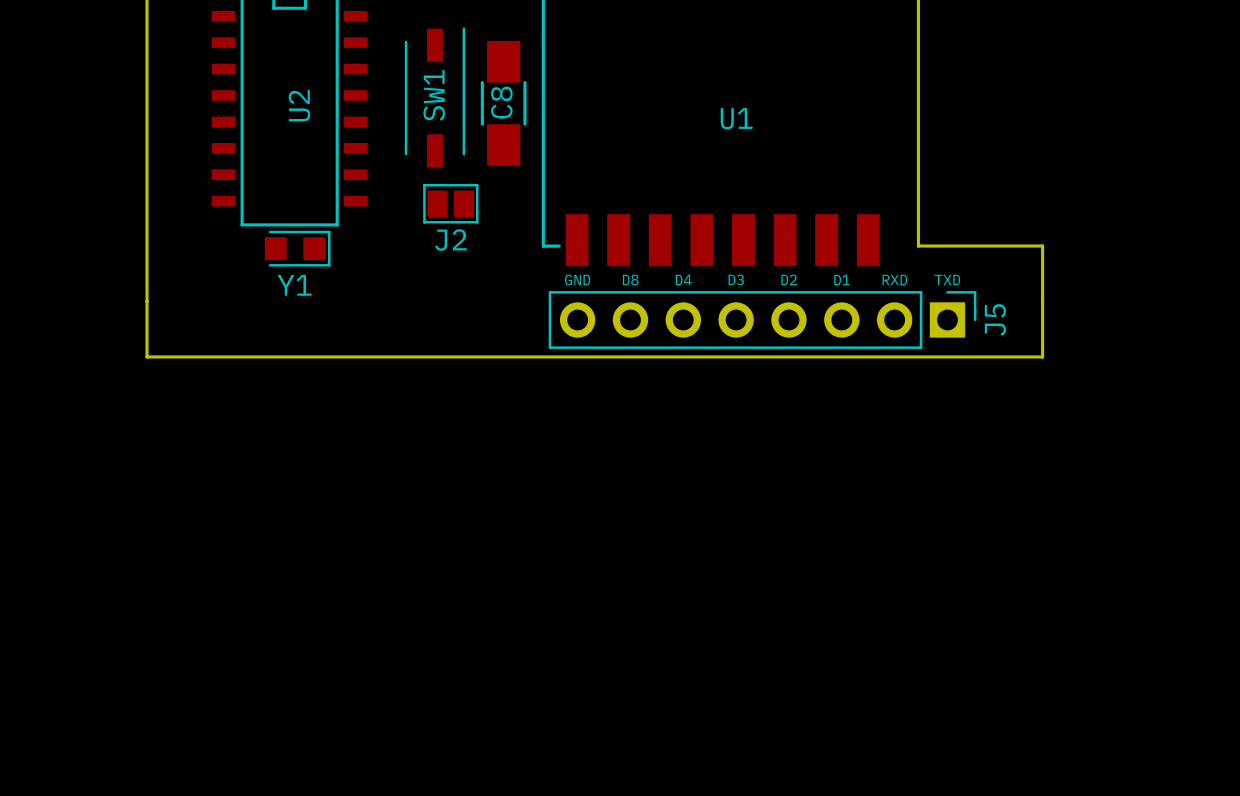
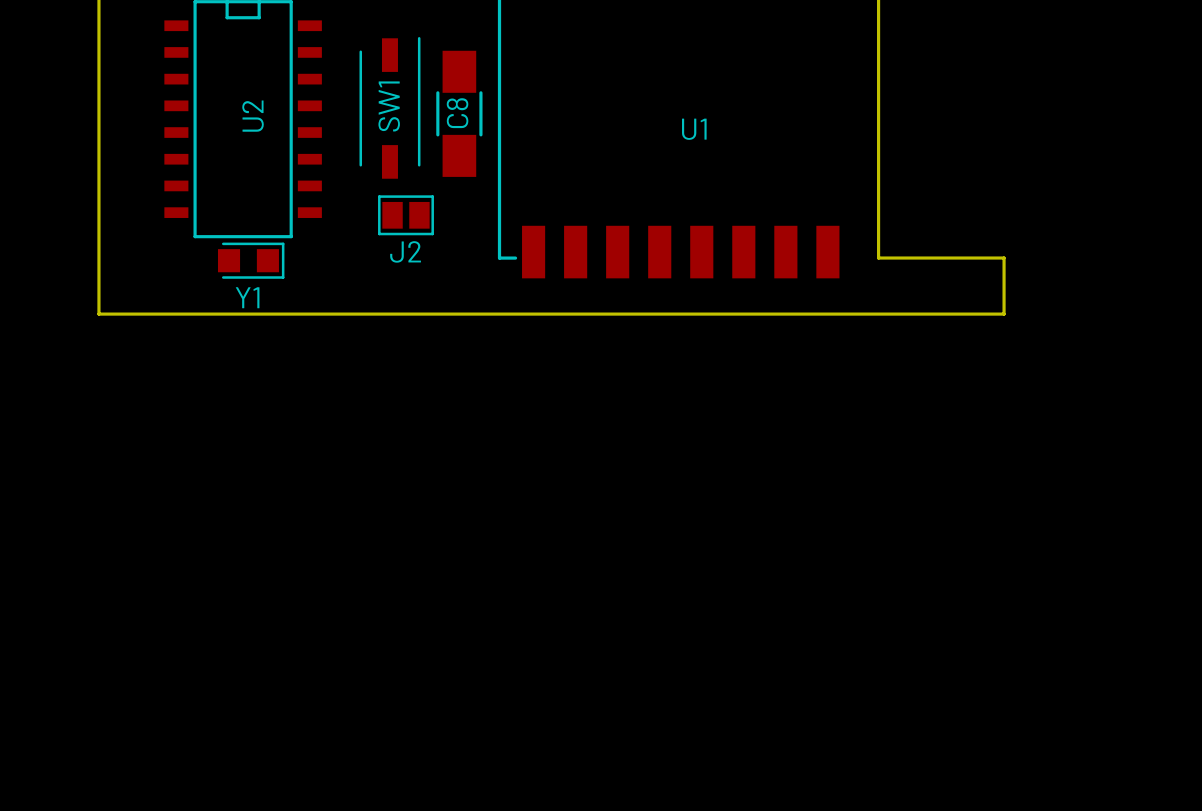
text: GND (577, 279) -> none
text: D8 (630, 279) -> none
text: D4 (683, 279) -> none
text: D3 (736, 279) -> none
text: D2 (789, 279) -> none
text: D1 (842, 279) -> none
text: RXD (894, 279) -> none
text: TXD (947, 279) -> none
board edge: (147, 301) (147, 356) (1042, 356) (1042, 301) -> (98, 314) (1004, 314)
J5: (762, 319) -> none

